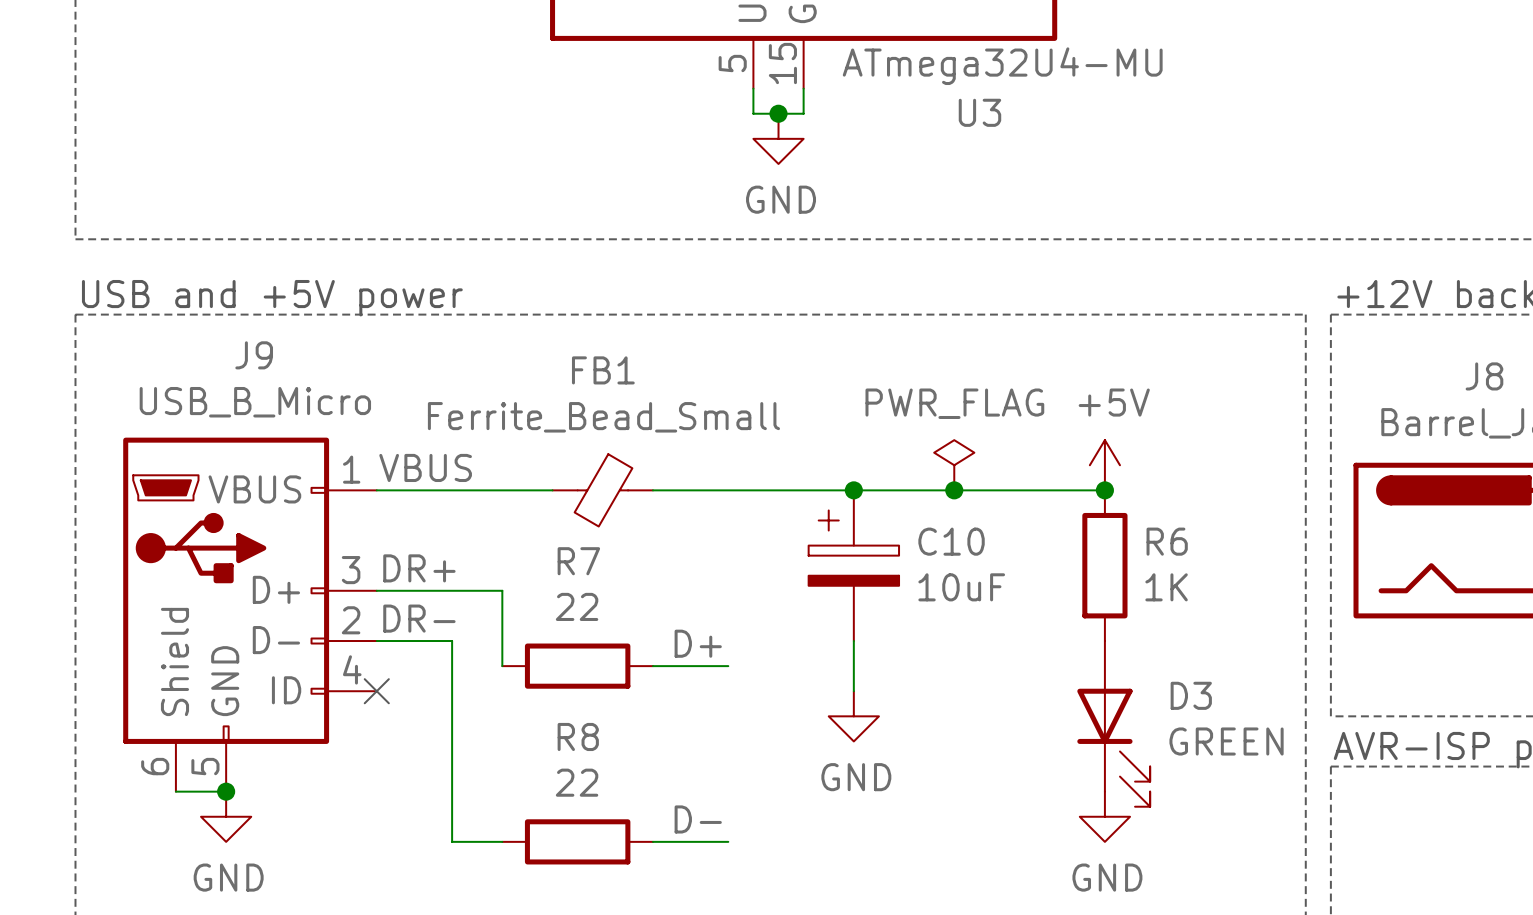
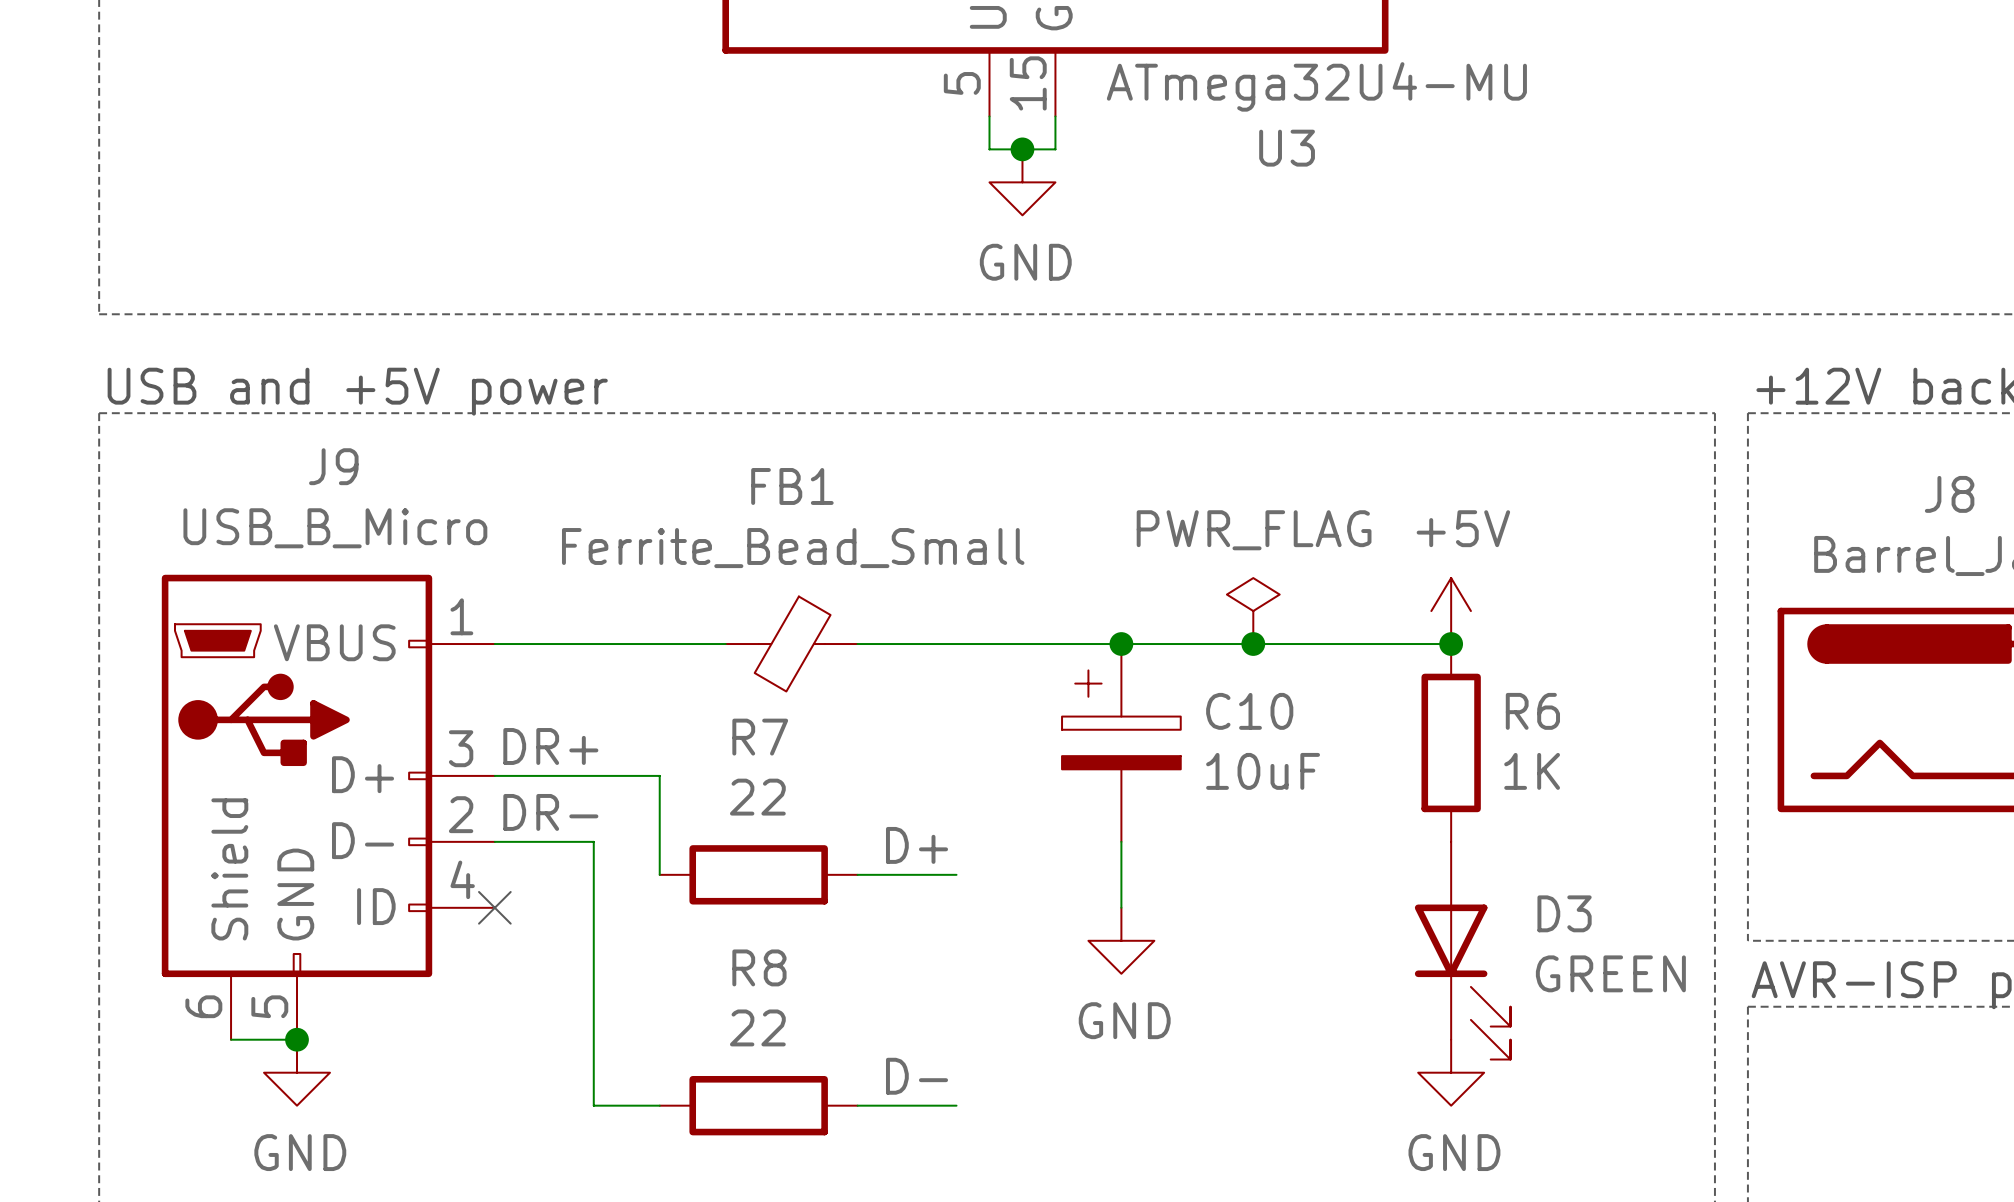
label: VBUS (425, 467) -> none

